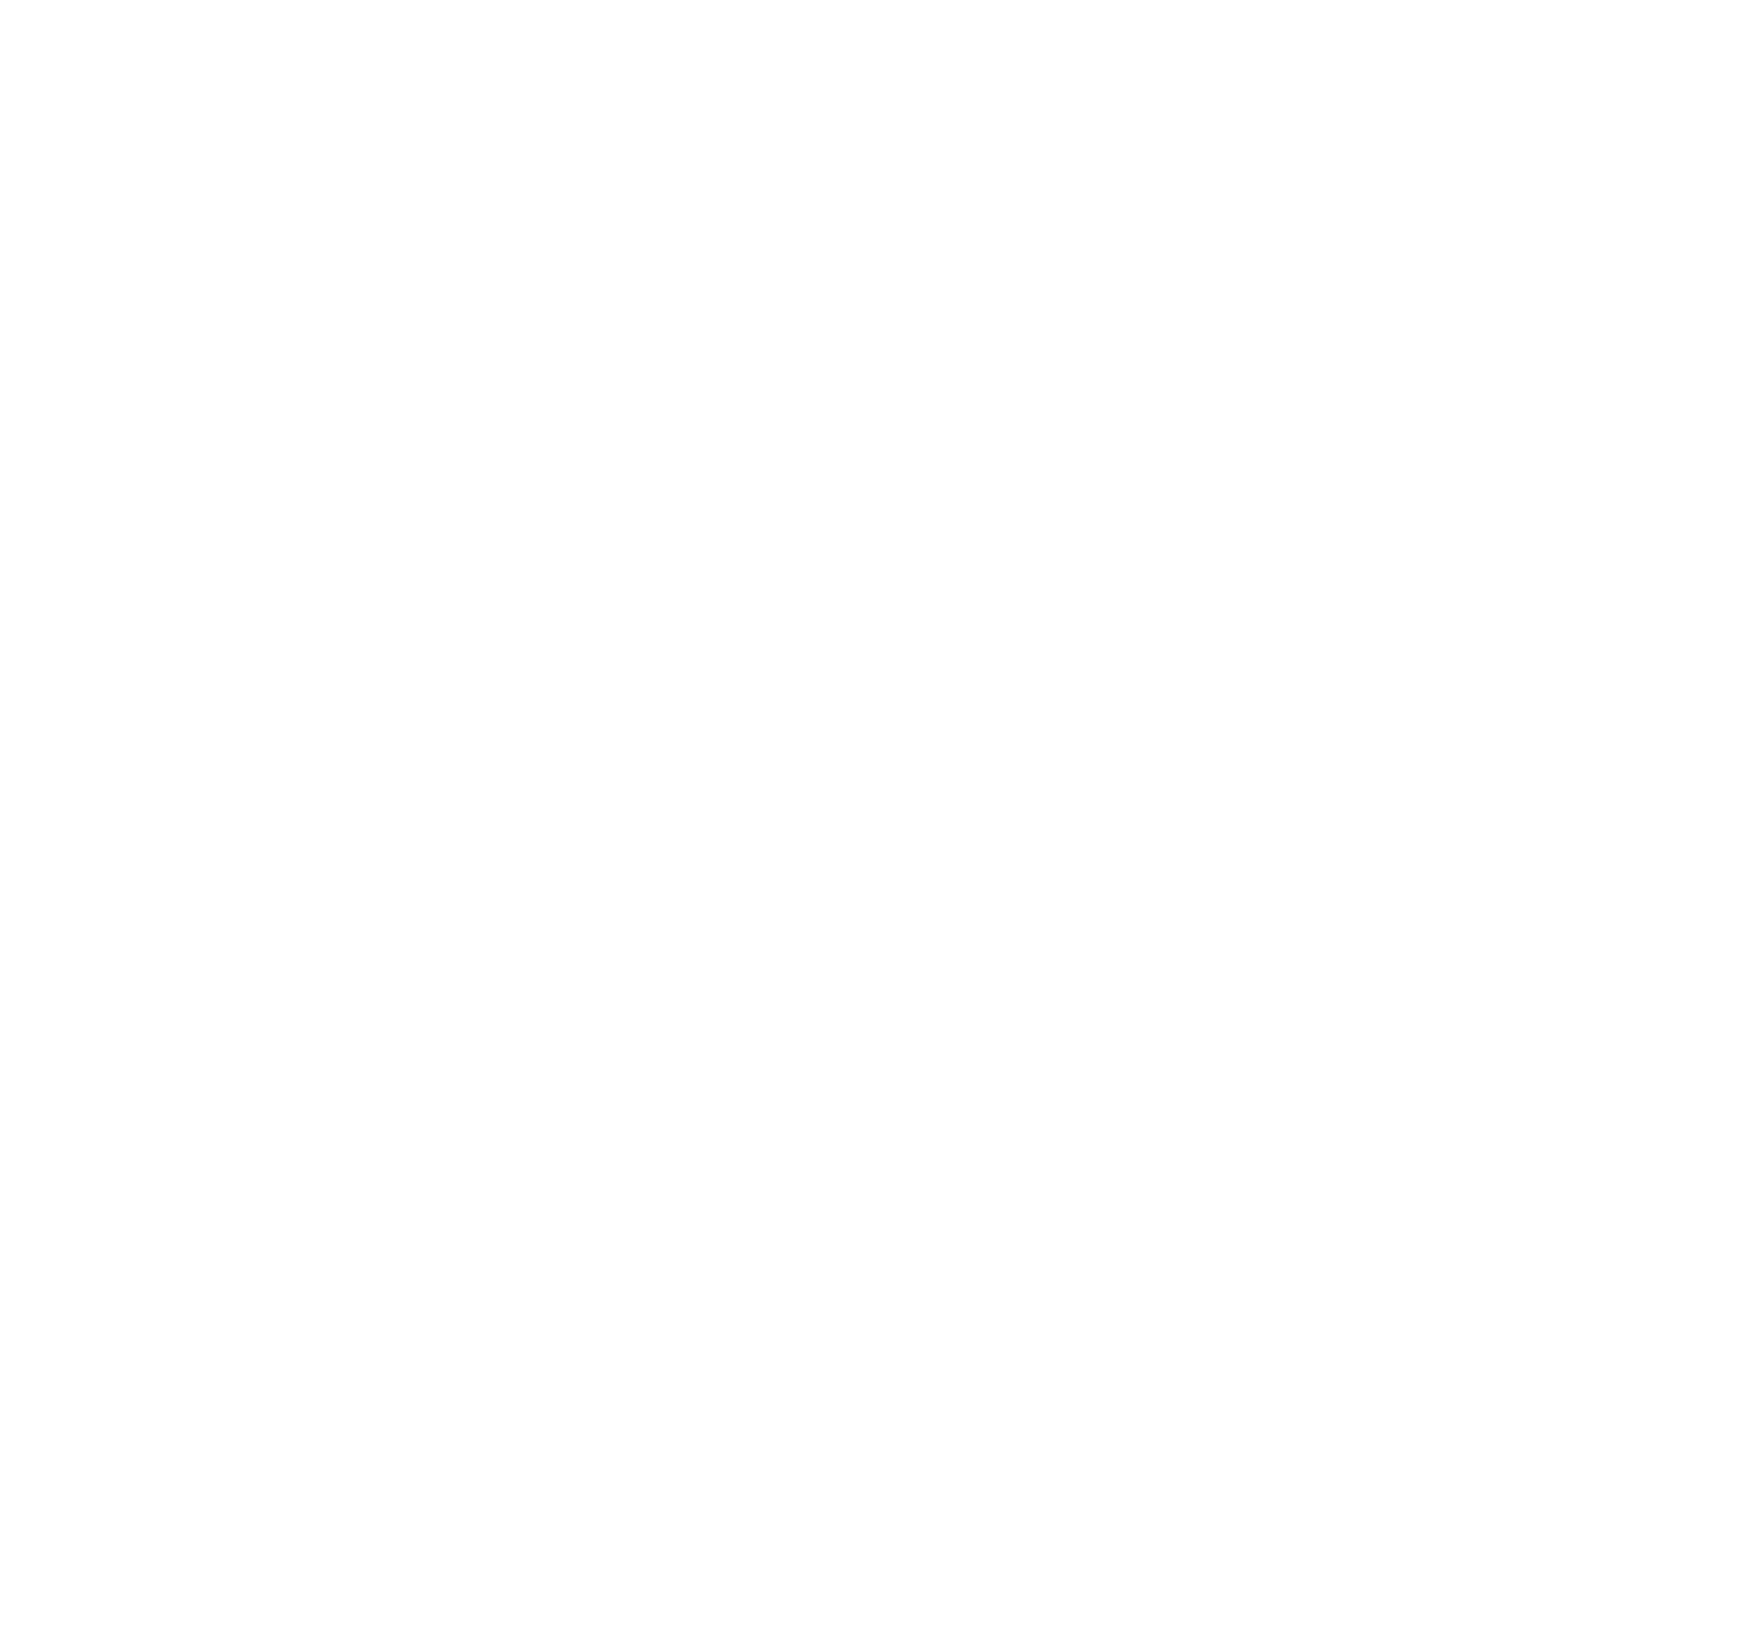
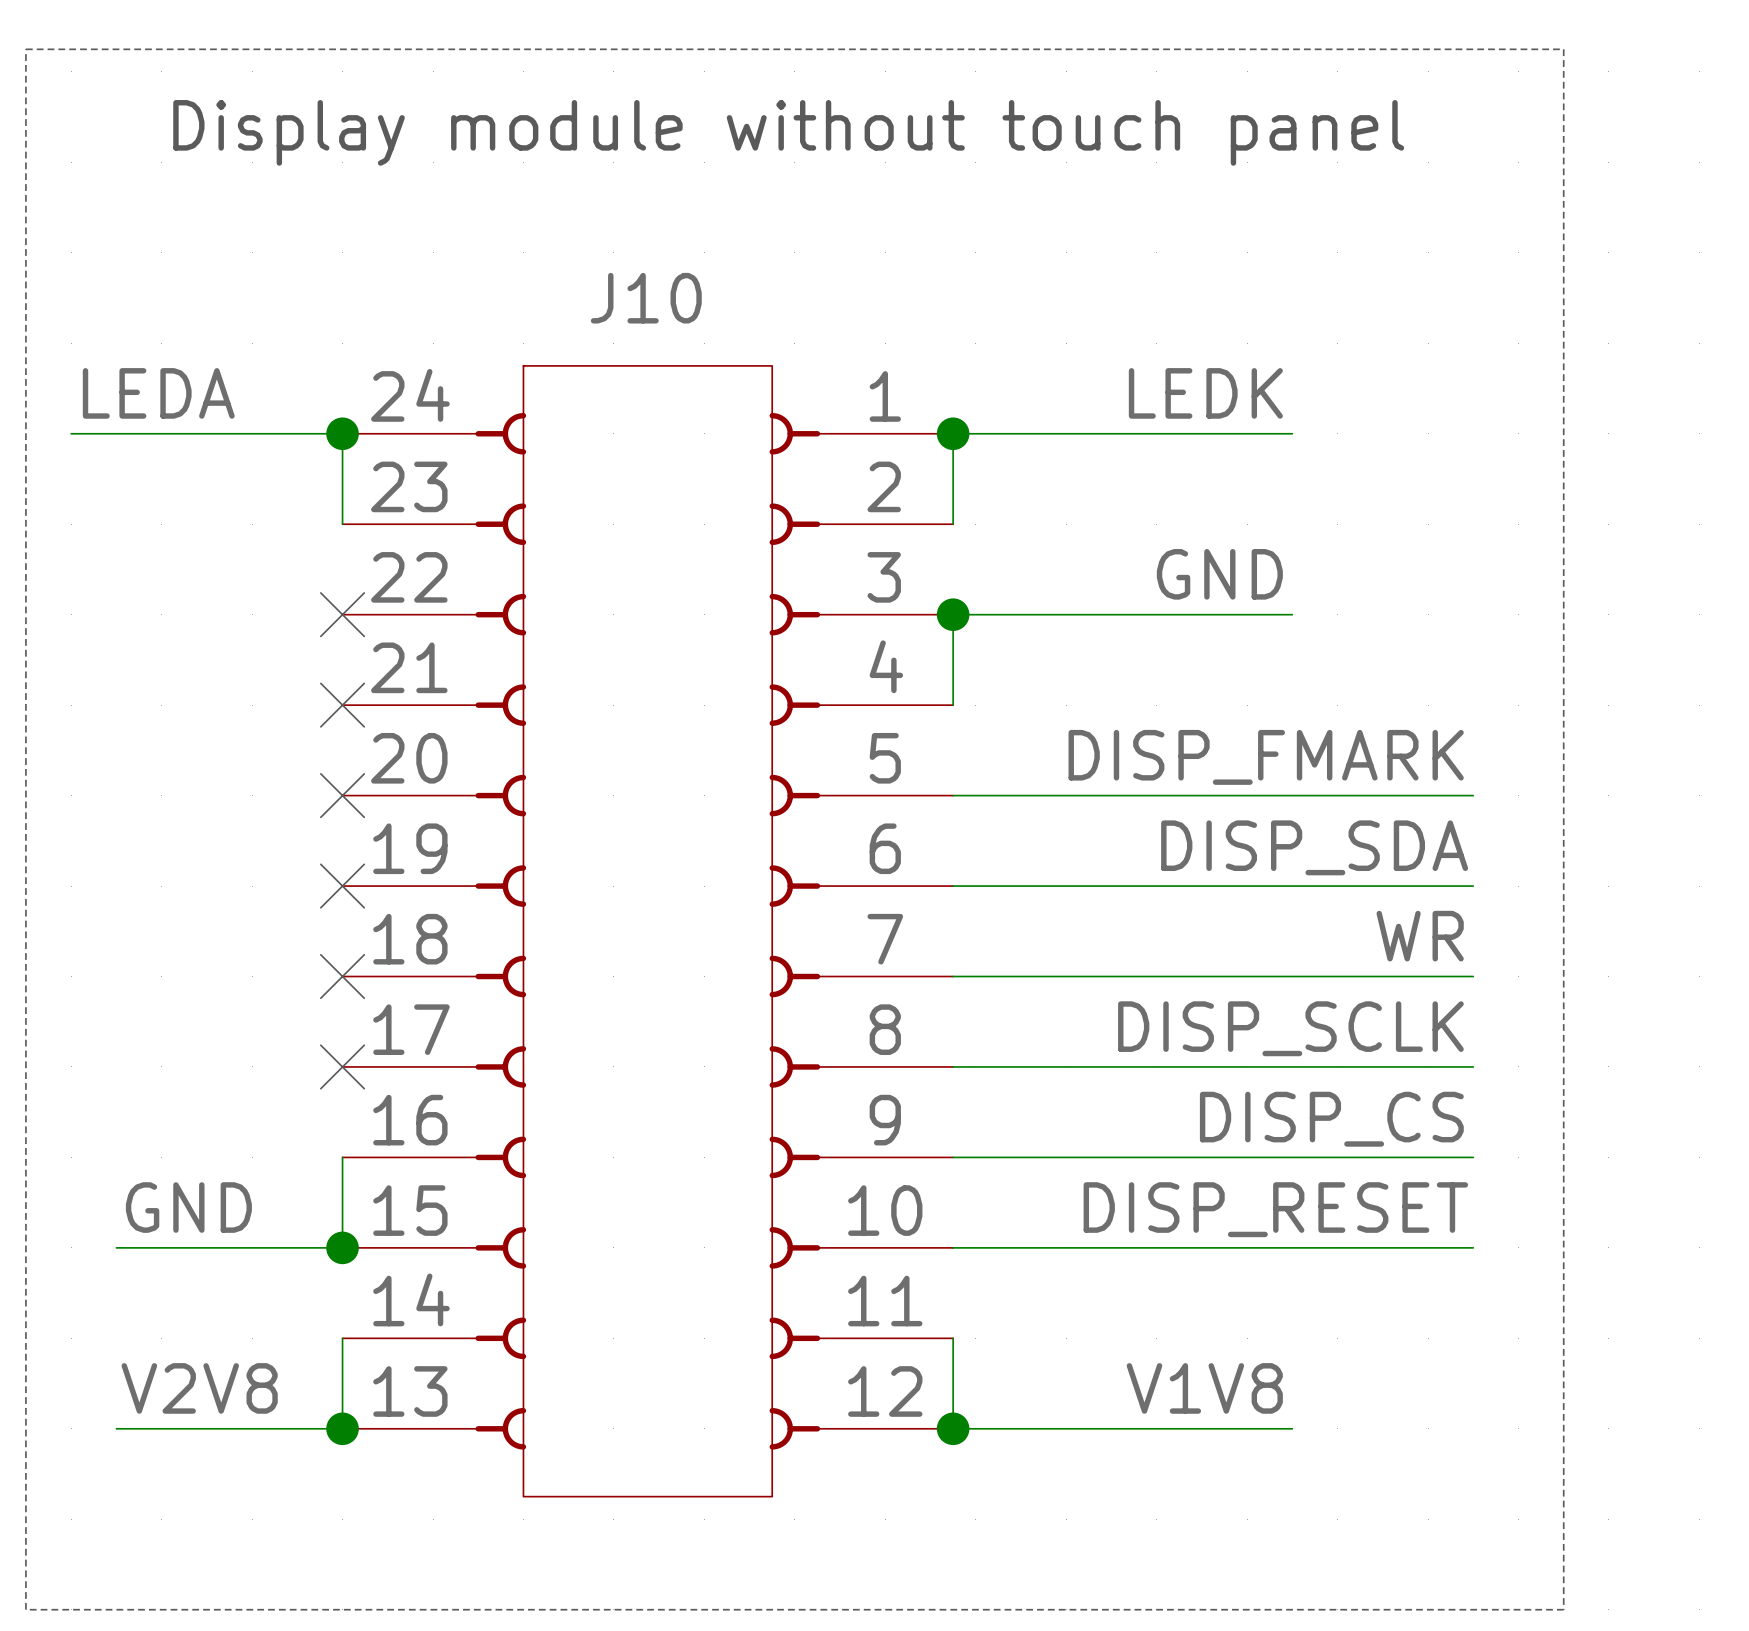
line: none -> (25, 49) (1563, 49) (1563, 1609) (25, 1609) (25, 49)
text: none -> Display module without touch panel (788, 132)
label: none -> LEDA (158, 393)
label: none -> LEDK (1205, 393)
wire: none -> (71, 433) (342, 433) (342, 524)
junction: none -> (342, 433)
junction: none -> (953, 433)
wire: none -> (1292, 433) (953, 433) (953, 524)
label: none -> GND (1219, 574)
no-connect mark: none -> (342, 614)
junction: none -> (953, 614)
wire: none -> (1292, 614) (953, 614) (953, 705)
no-connect mark: none -> (342, 705)
label: none -> DISP_FMARK (1266, 757)
no-connect mark: none -> (342, 795)
wire: none -> (953, 795) (1473, 795)
label: none -> DISP_SDA (1314, 847)
no-connect mark: none -> (342, 886)
wire: none -> (953, 886) (1473, 886)
J10: none -> (647, 931)
label: none -> WR (1420, 936)
no-connect mark: none -> (342, 976)
wire: none -> (953, 976) (1473, 976)
label: none -> DISP_SCLK (1290, 1028)
no-connect mark: none -> (342, 1066)
wire: none -> (953, 1066) (1473, 1066)
label: none -> DISP_CS (1331, 1119)
wire: none -> (342, 1157) (342, 1247) (116, 1247)
wire: none -> (953, 1157) (1473, 1157)
label: none -> GND (188, 1207)
label: none -> DISP_RESET (1275, 1209)
junction: none -> (342, 1247)
wire: none -> (953, 1247) (1473, 1247)
wire: none -> (342, 1338) (342, 1428) (116, 1428)
wire: none -> (953, 1338) (953, 1428) (1292, 1428)
label: none -> V2V8 (199, 1388)
label: none -> V1V8 (1204, 1388)
junction: none -> (342, 1428)
junction: none -> (953, 1428)

